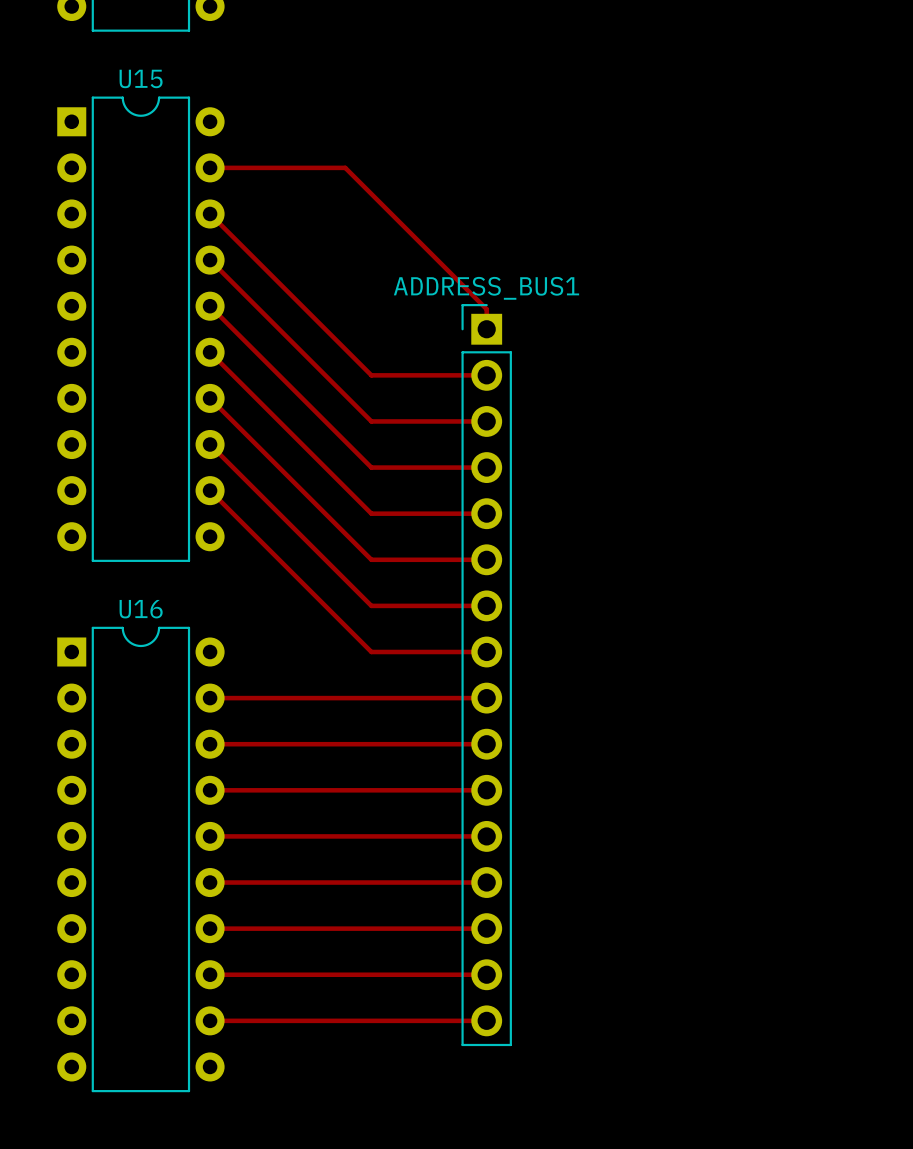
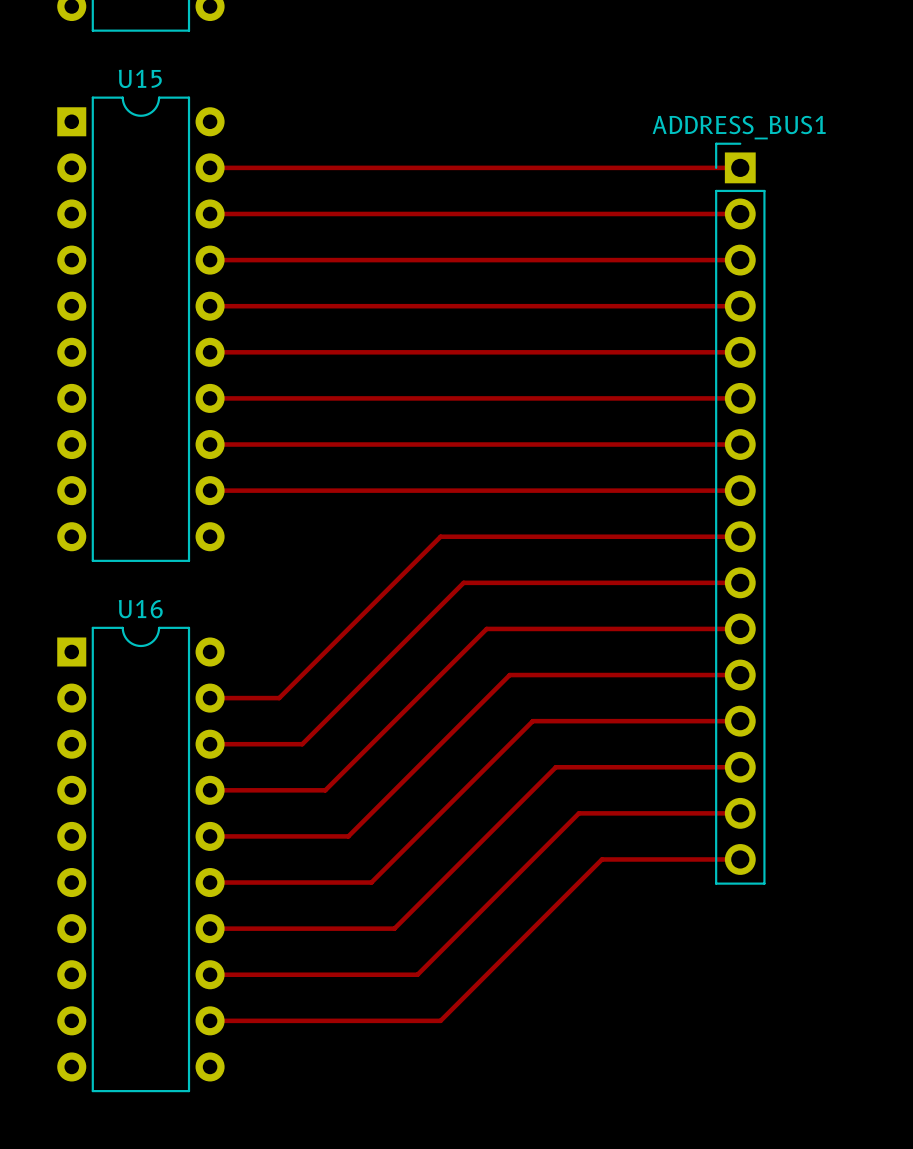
top track: (345, 167) (486, 309) (486, 329) -> (345, 167) (740, 167)
top track: (210, 213) (371, 375) (486, 375) -> (210, 213) (740, 213)
top track: (210, 260) (371, 421) (486, 421) -> (210, 260) (740, 260)
top track: (210, 306) (371, 467) (486, 467) -> (210, 306) (740, 306)
top track: (210, 352) (371, 513) (486, 513) -> (210, 352) (740, 352)
top track: (210, 398) (371, 559) (486, 559) -> (210, 398) (740, 398)
top track: (210, 444) (371, 605) (486, 605) -> (210, 444) (740, 444)
top track: (210, 490) (371, 651) (486, 651) -> (210, 490) (740, 490)
ADDRESS_BUS1 position: (486, 675) -> (740, 513)
top track: (279, 698) (486, 698) -> (279, 698) (440, 536) (740, 536)
top track: (302, 744) (486, 744) -> (302, 744) (463, 582) (740, 582)
top track: (325, 790) (486, 790) -> (325, 790) (486, 628) (740, 628)
top track: (348, 836) (486, 836) -> (348, 836) (509, 675) (740, 675)
top track: (371, 882) (486, 882) -> (371, 882) (532, 721) (740, 721)
top track: (394, 928) (486, 928) -> (394, 928) (555, 767) (740, 767)
top track: (417, 974) (486, 974) -> (417, 974) (578, 813) (740, 813)
top track: (440, 1020) (486, 1020) -> (440, 1020) (601, 859) (740, 859)

